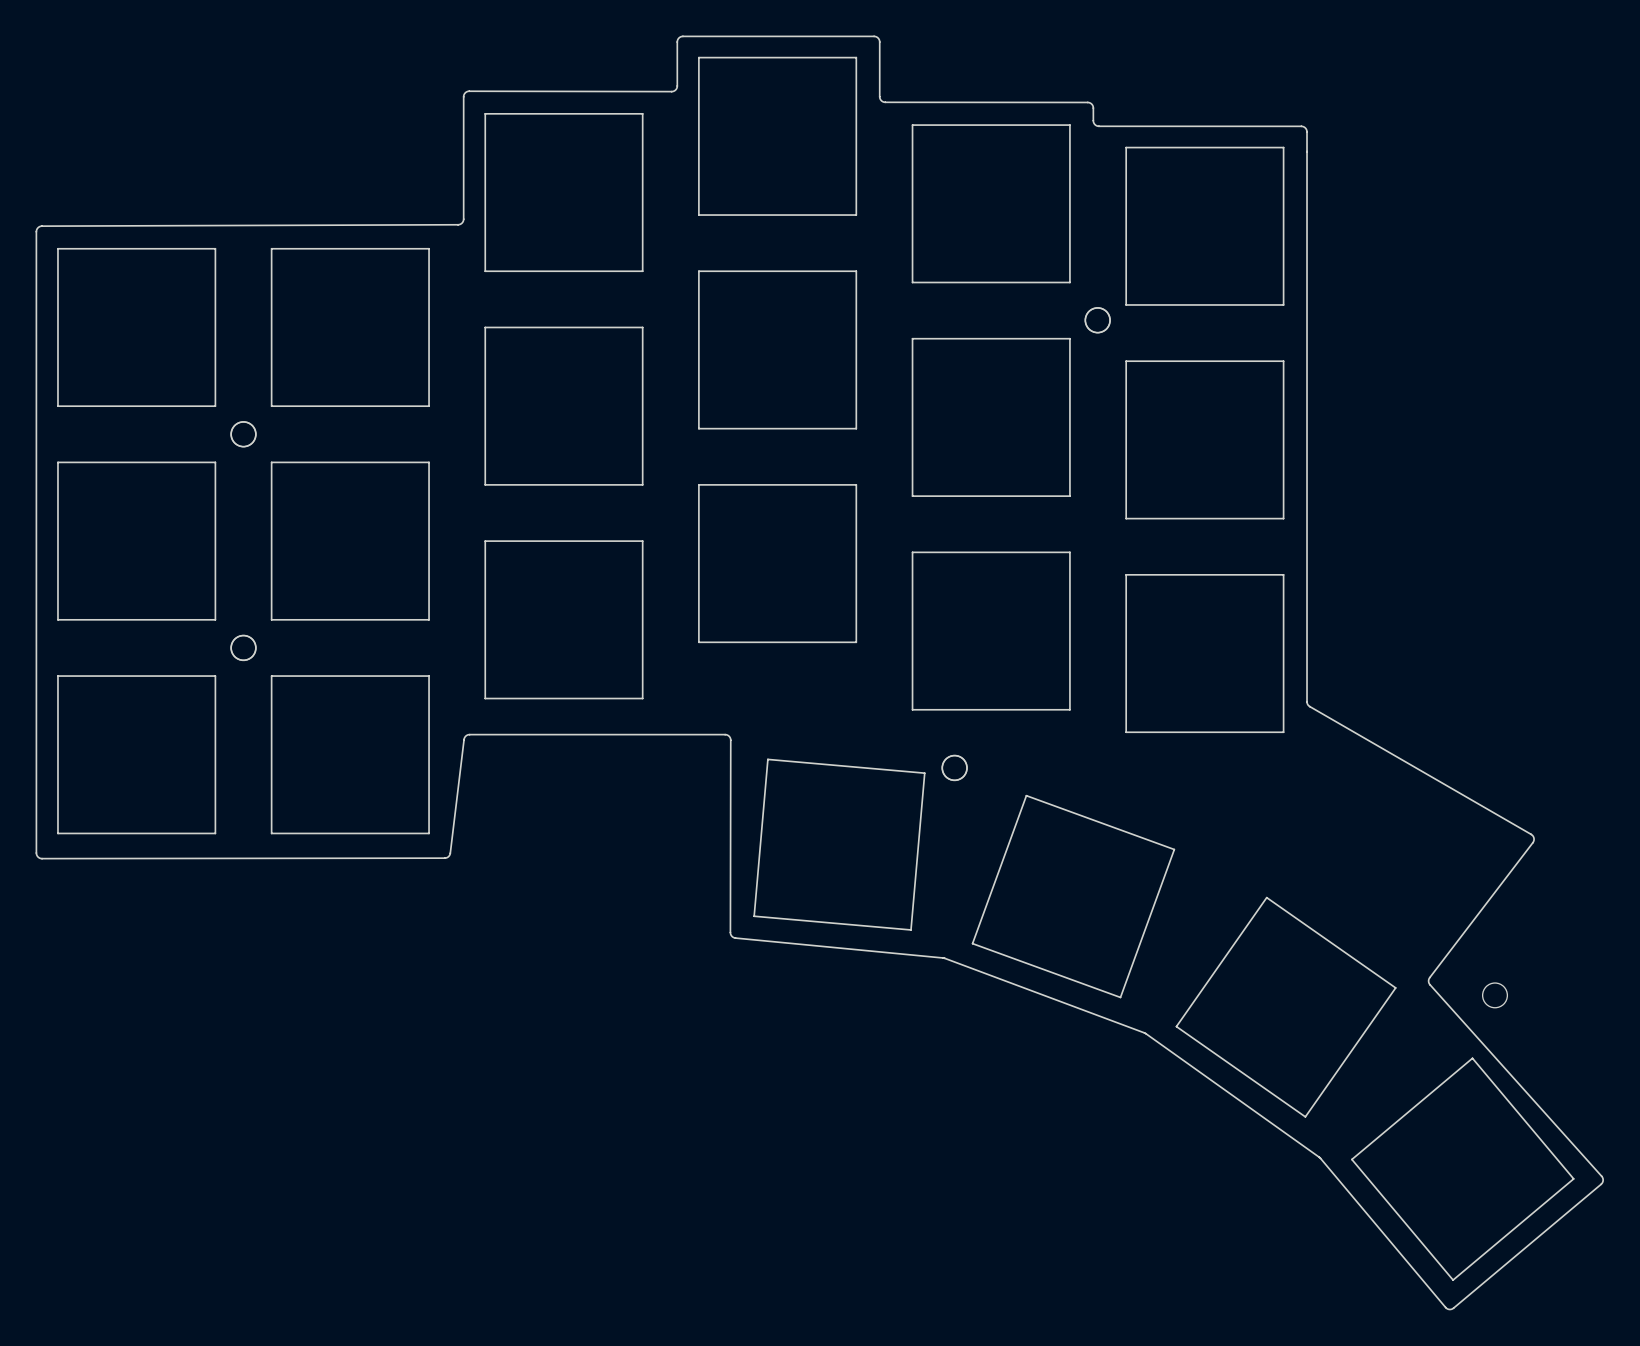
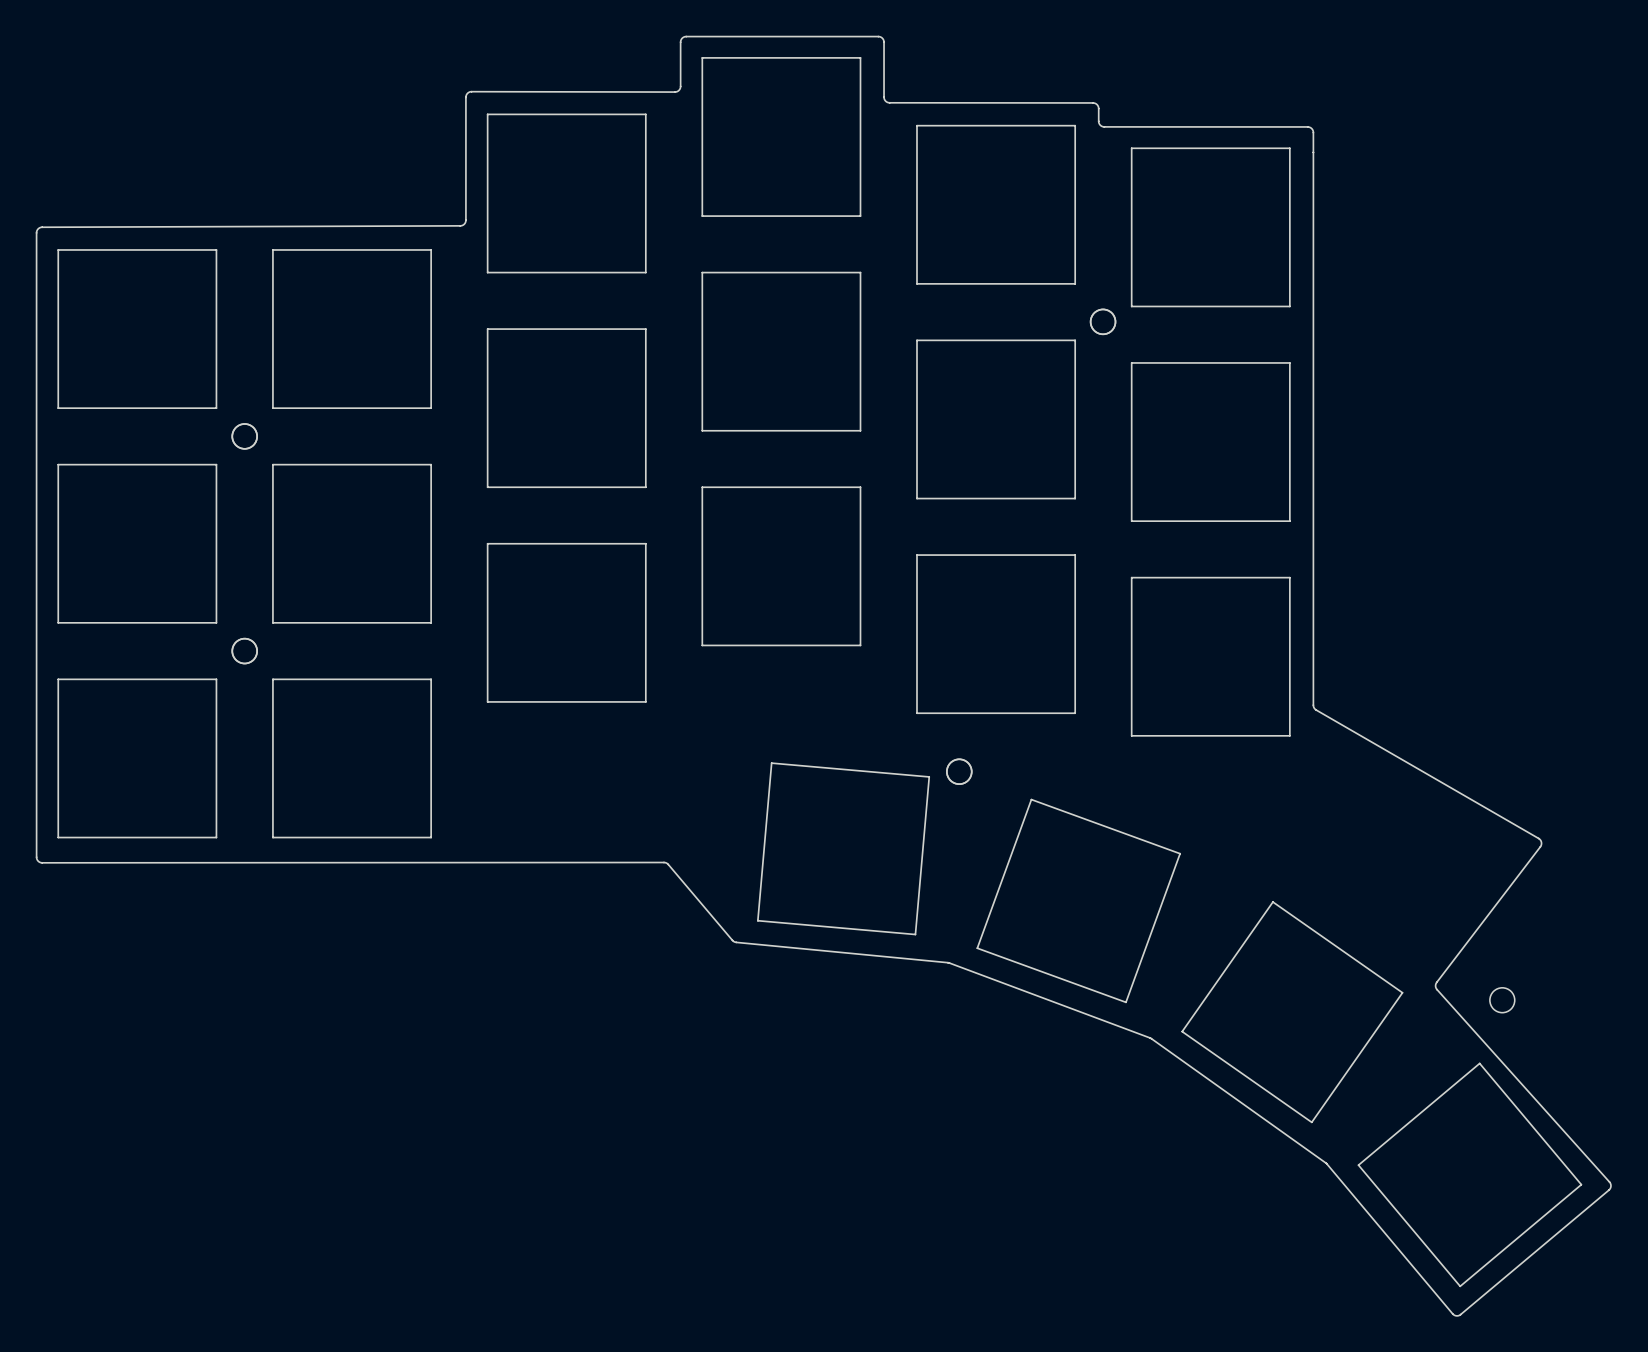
board edge: (42, 858) (445, 858) (450, 853) (464, 739) (467, 734) (725, 734) (730, 740) (730, 932) (735, 938) -> (42, 862) (664, 862) (732, 940) (739, 942)

